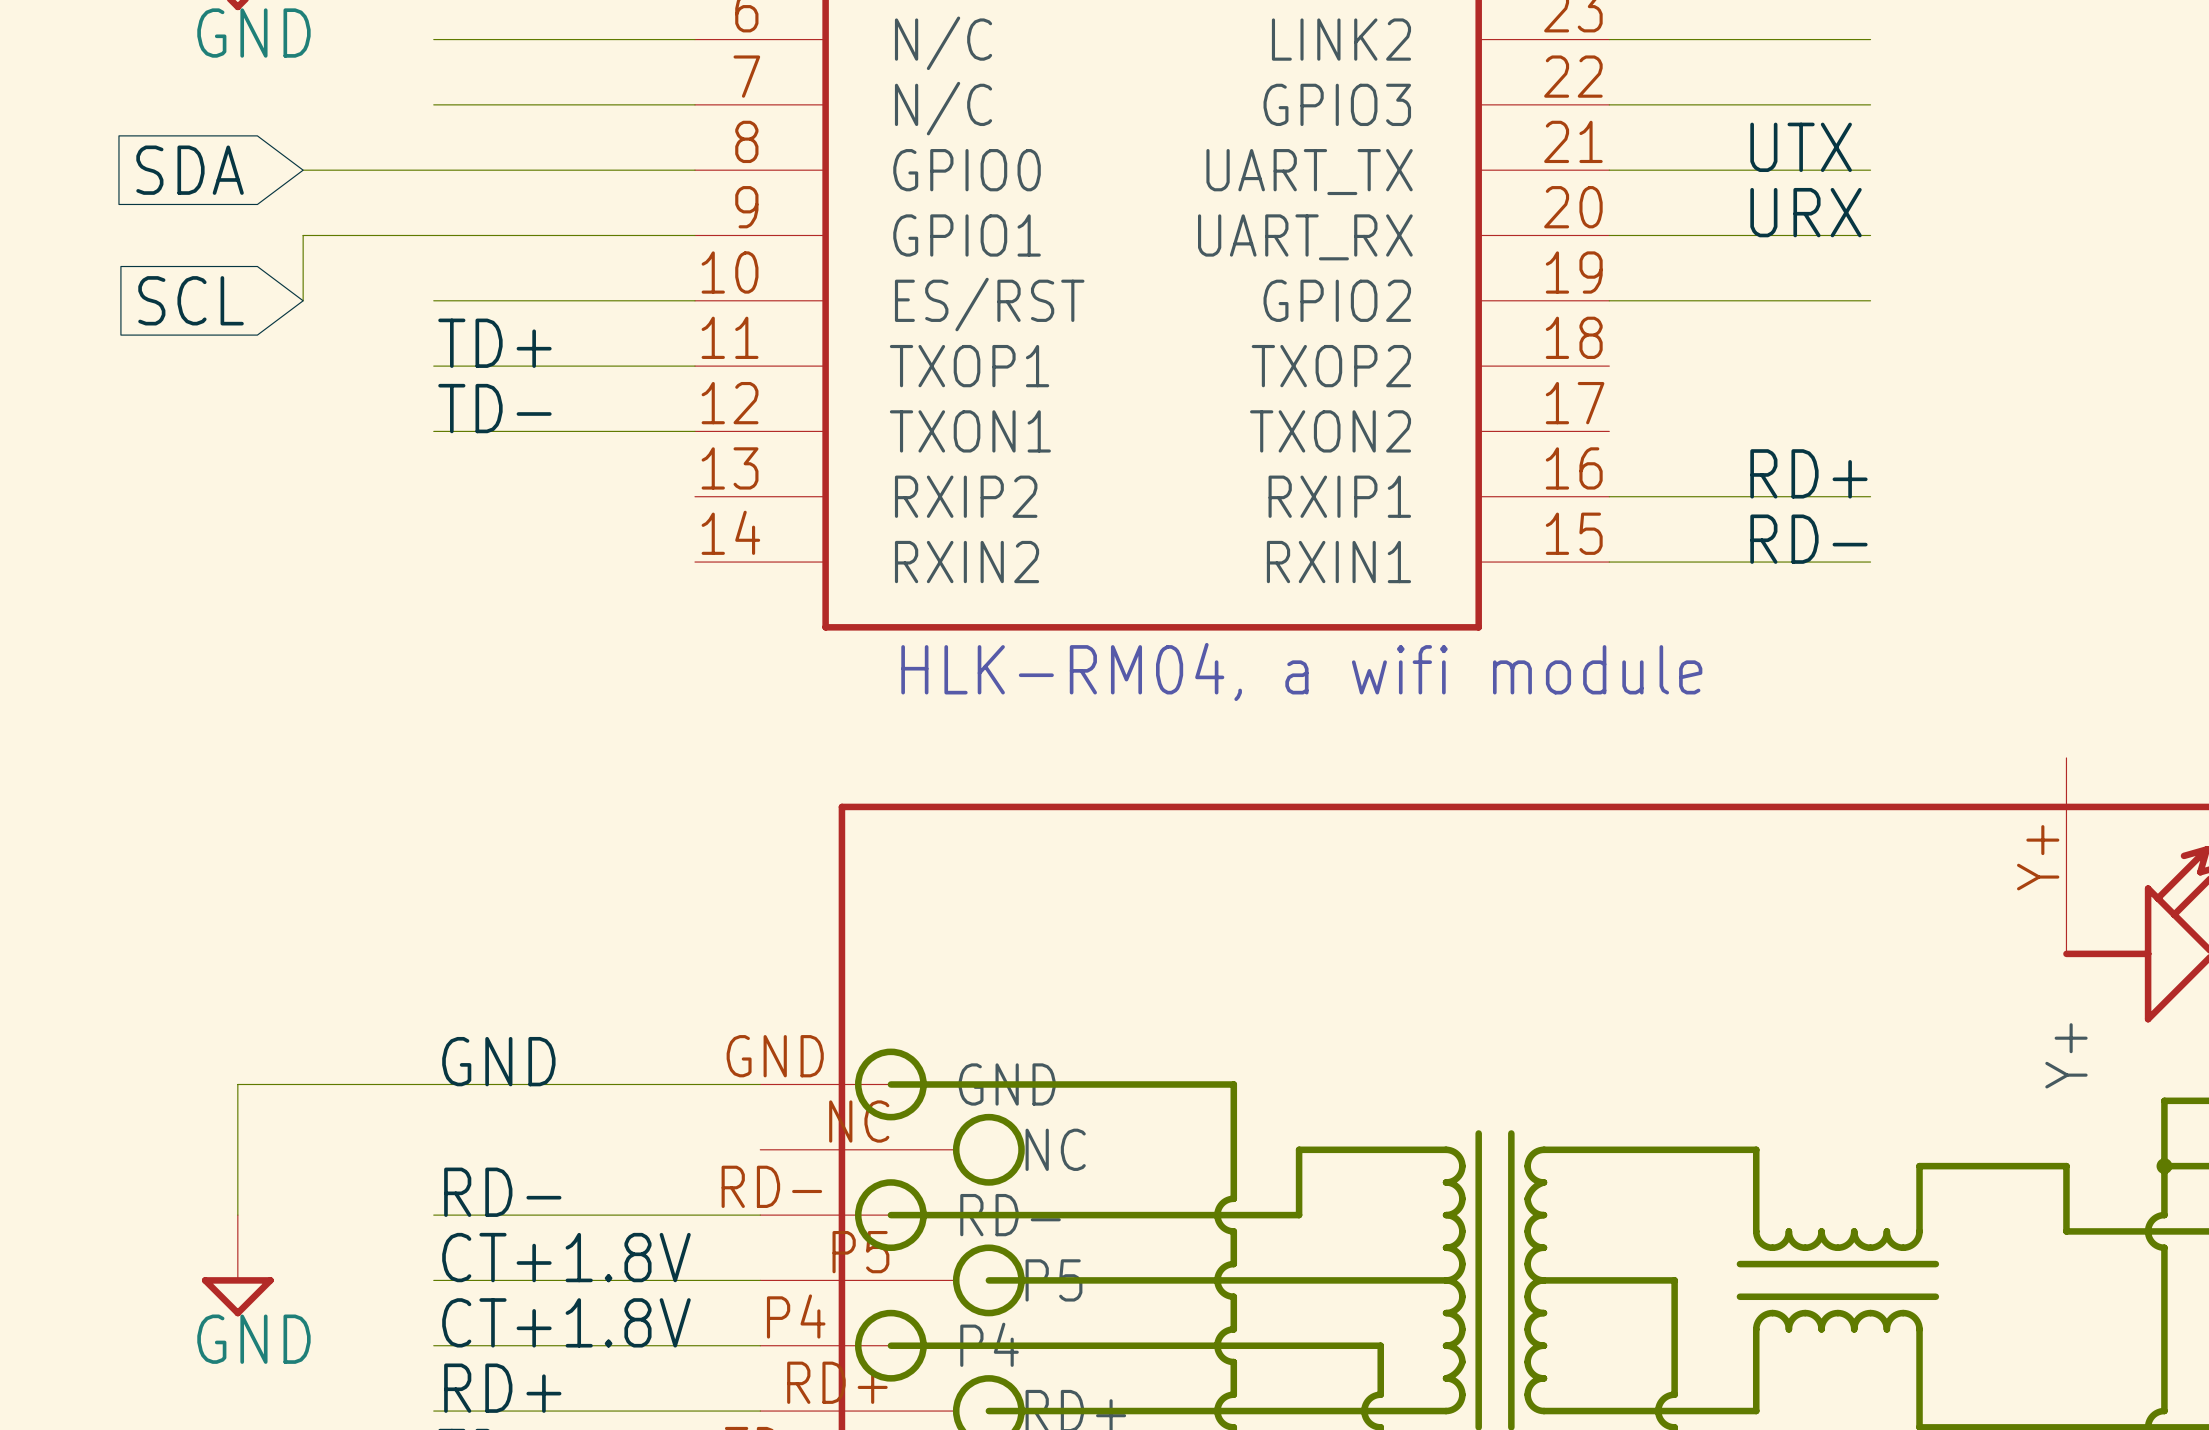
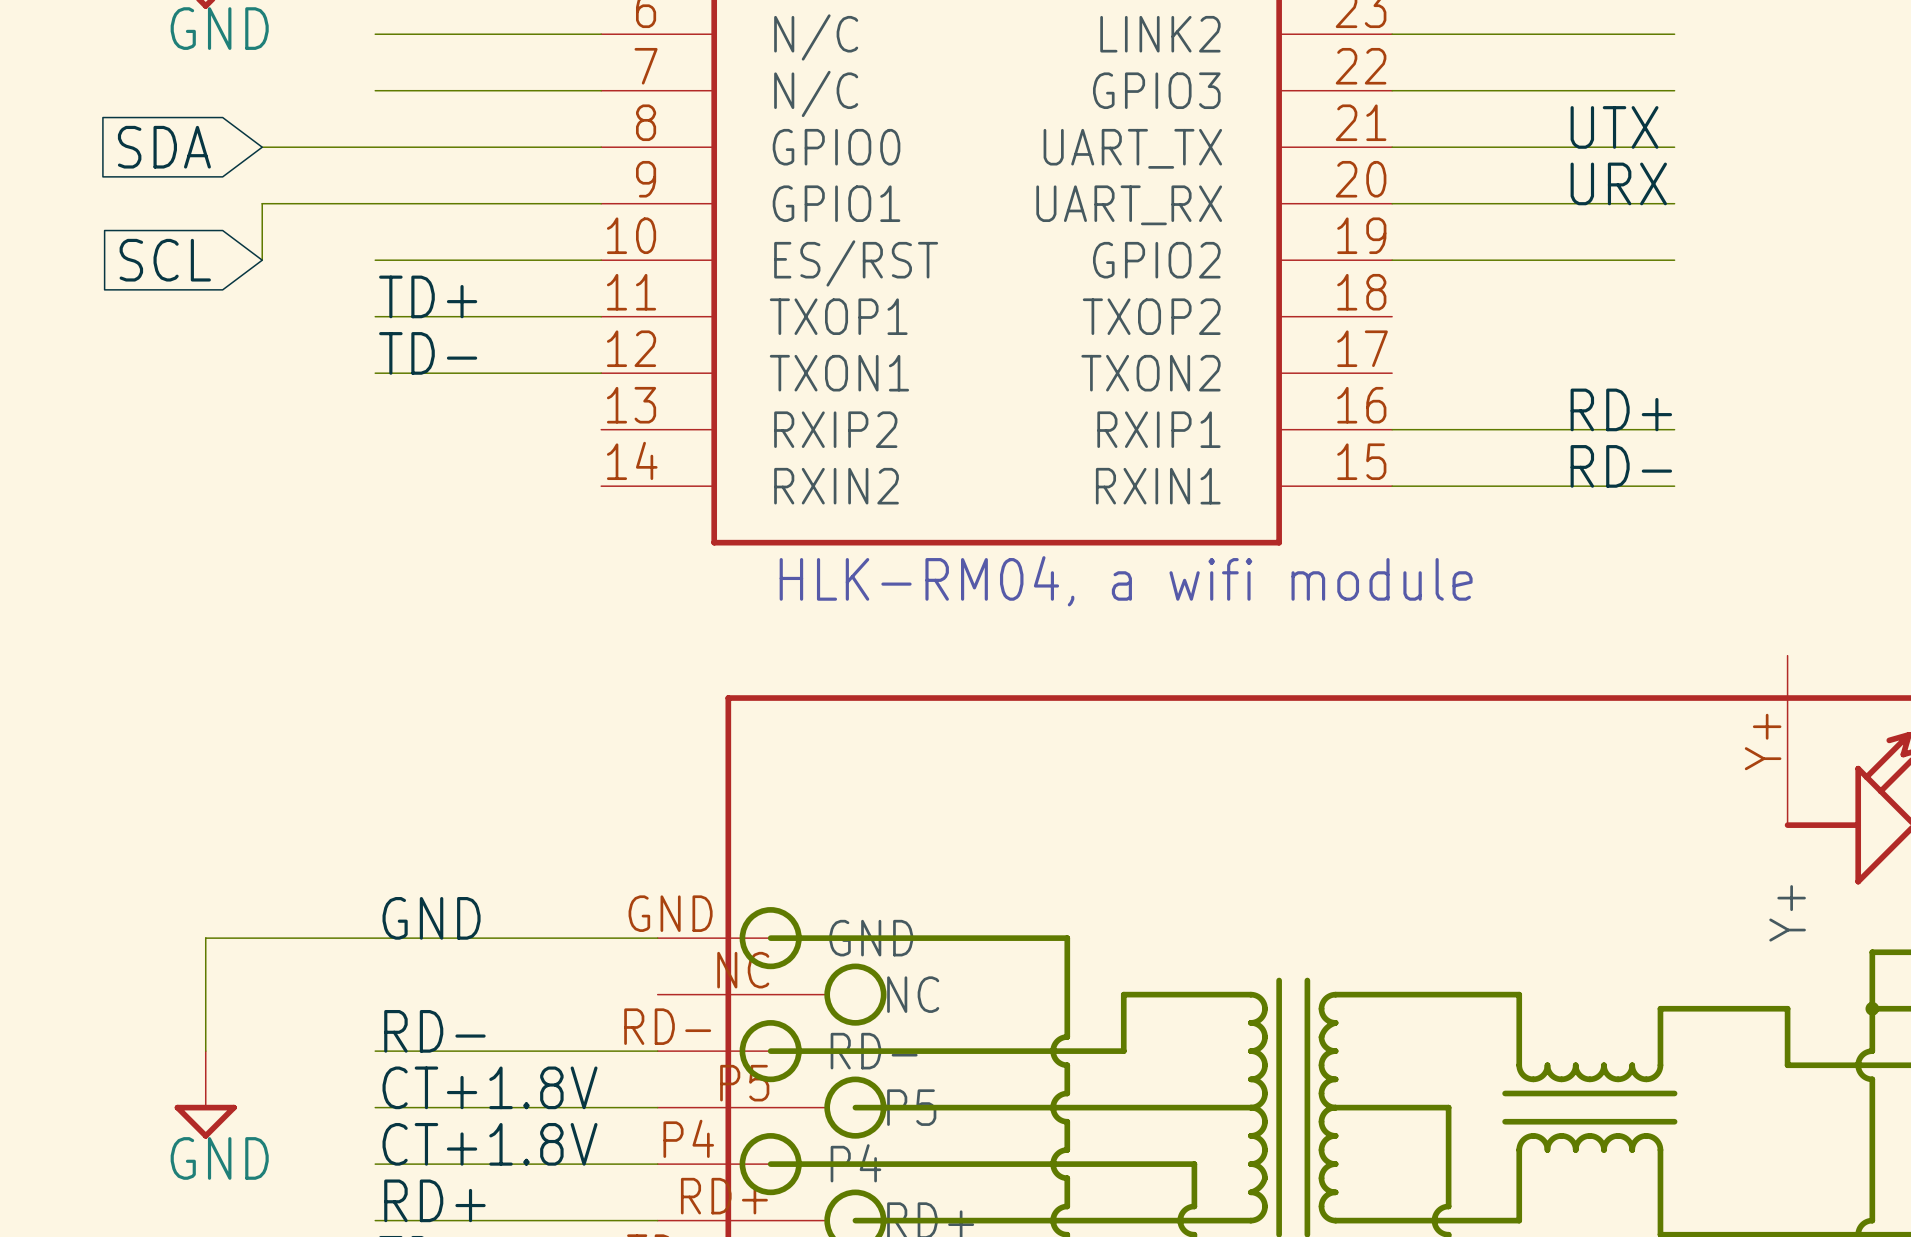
wire: none -> (1618, 34) (1674, 34)
wire: none -> (1618, 90) (1674, 90)
label position: UTX (1801, 147) -> UTX (1614, 127)
wire: none -> (1618, 147) (1674, 147)
label position: URX (1806, 212) -> URX (1618, 183)
wire: none -> (1618, 203) (1674, 203)
wire: none -> (1618, 260) (1674, 260)
label position: RD+ (1808, 473) -> RD+ (1621, 409)
wire: none -> (1618, 429) (1674, 429)
label position: RD- (1808, 539) -> RD- (1621, 466)
wire: none -> (1618, 486) (1674, 486)

